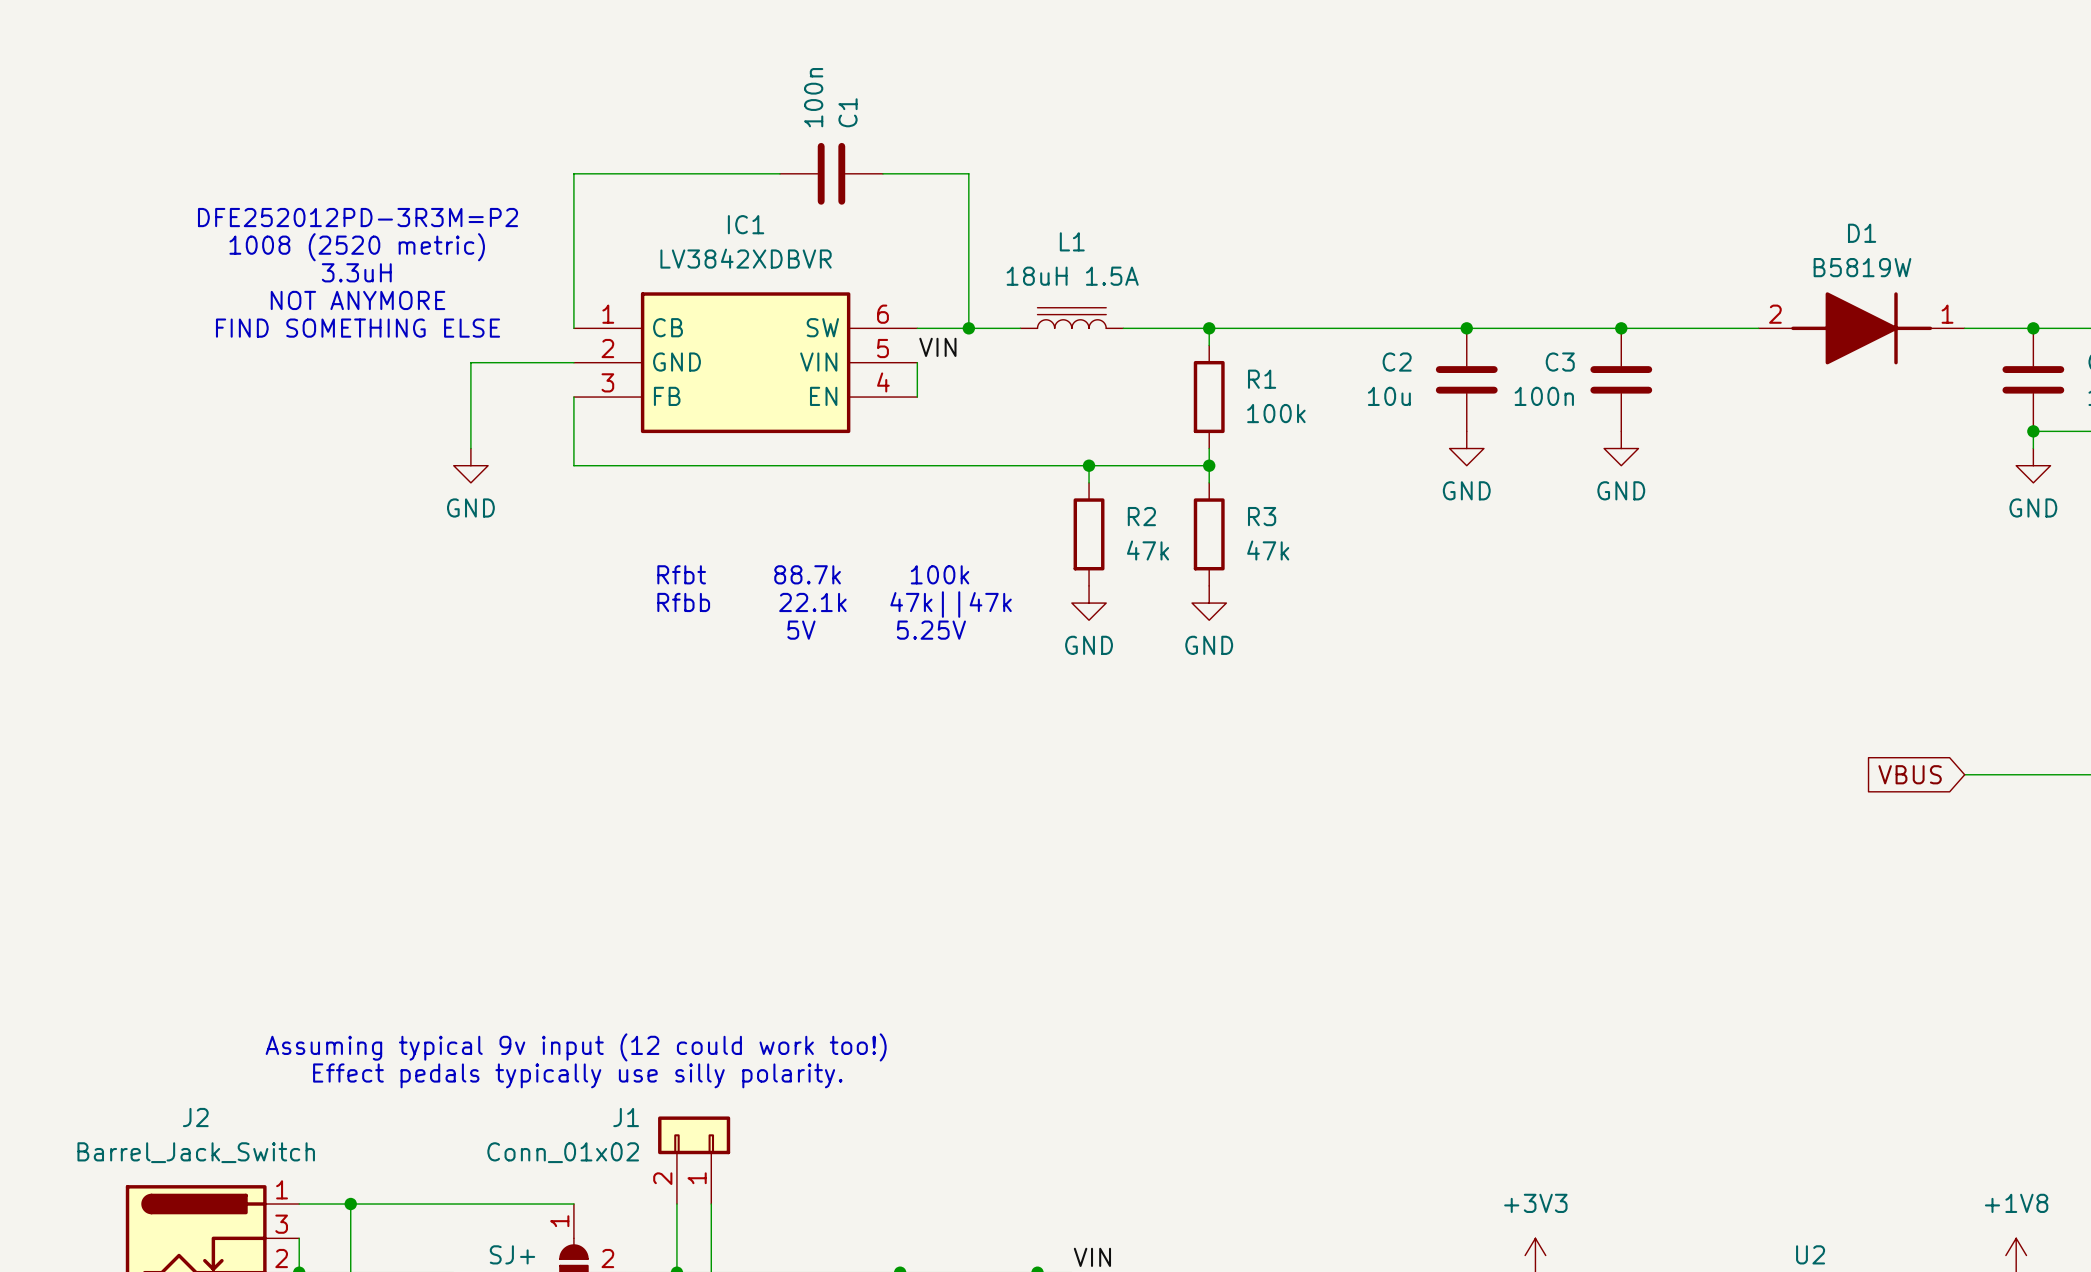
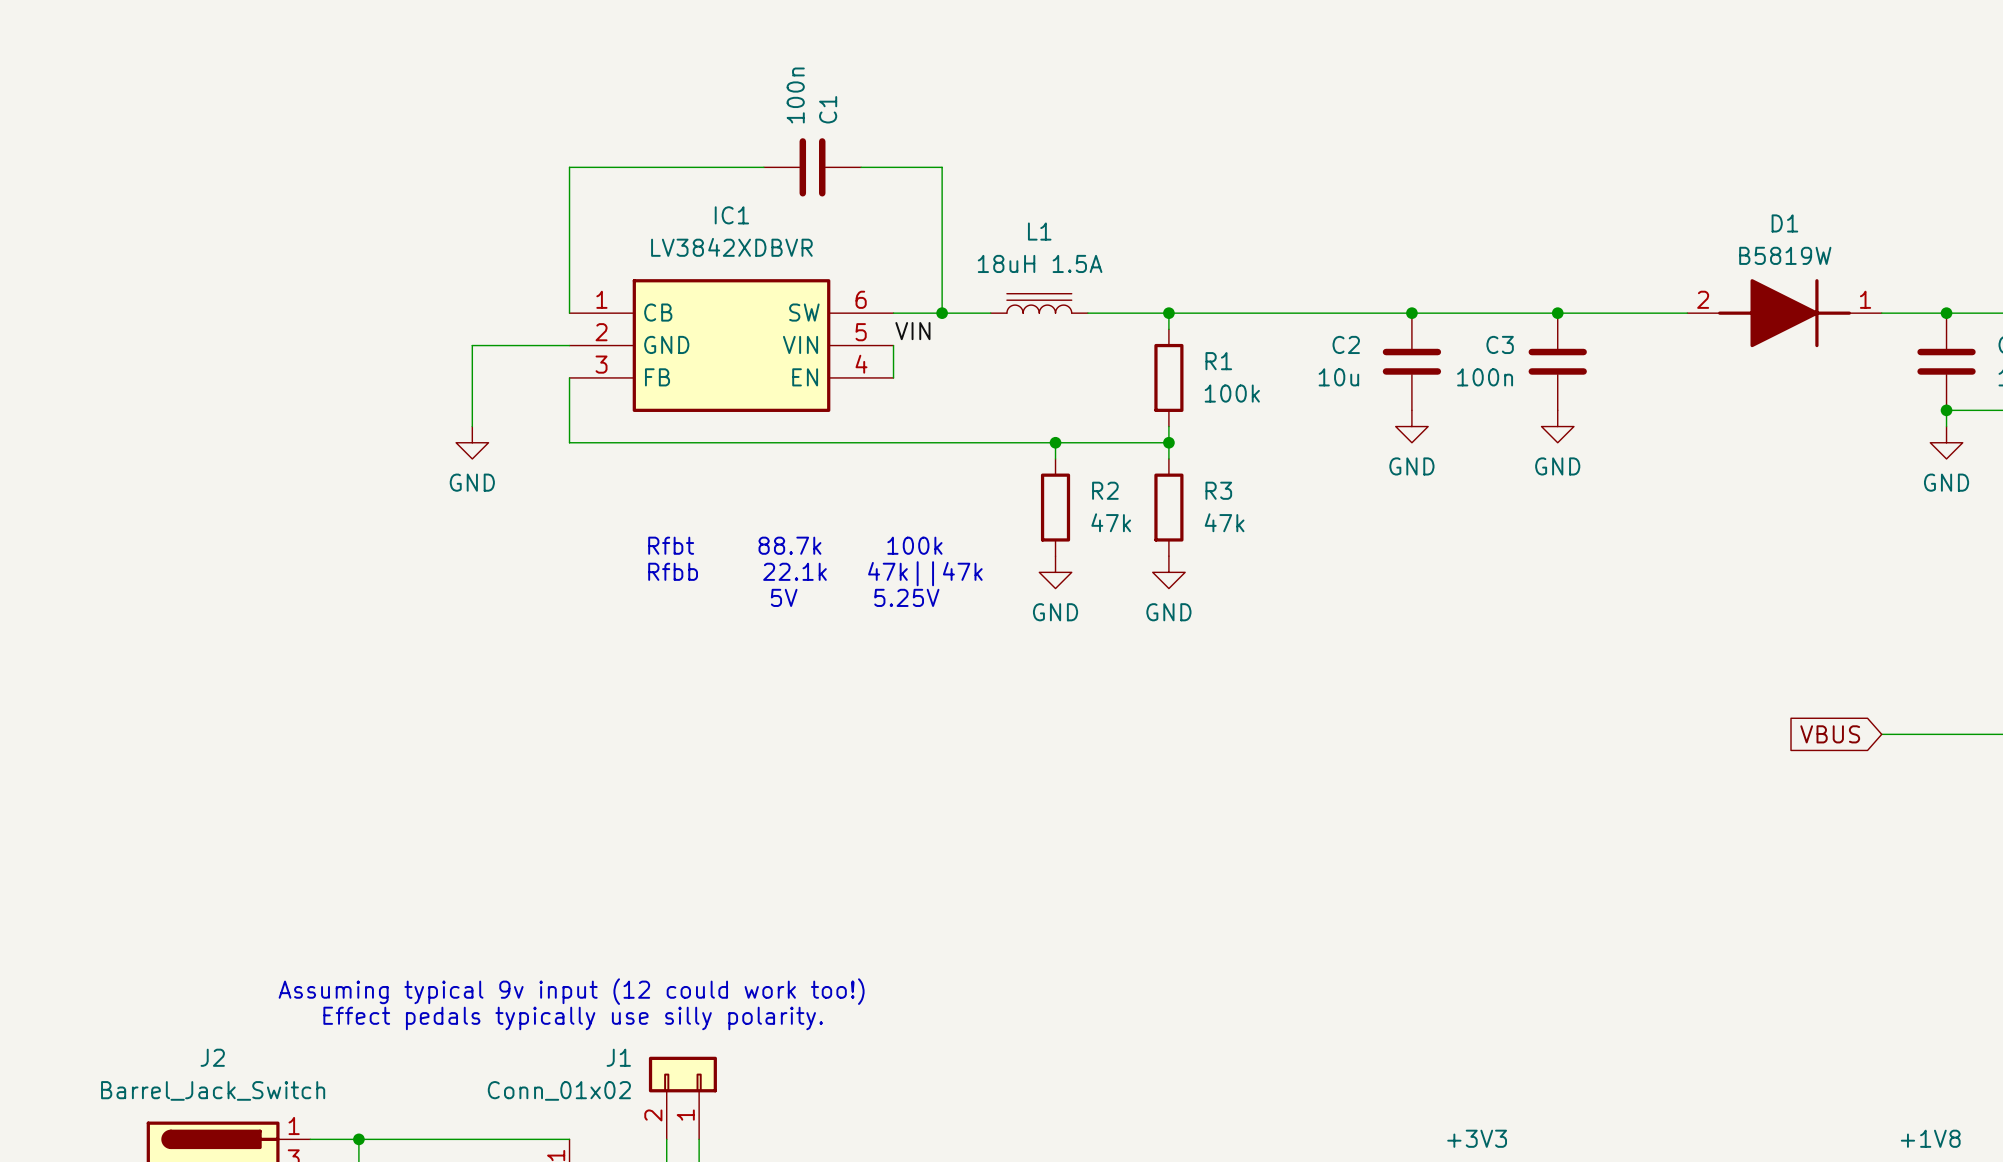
text: DFE252012PD-3R3M=P2 (358, 217) -> none
text: 1008 (2520 metric) (357, 247) -> none
text: 3.3uH (356, 272) -> none
text: NOT ANYMORE (358, 300) -> none
text: FIND SOMETHING ELSE (358, 328) -> none

